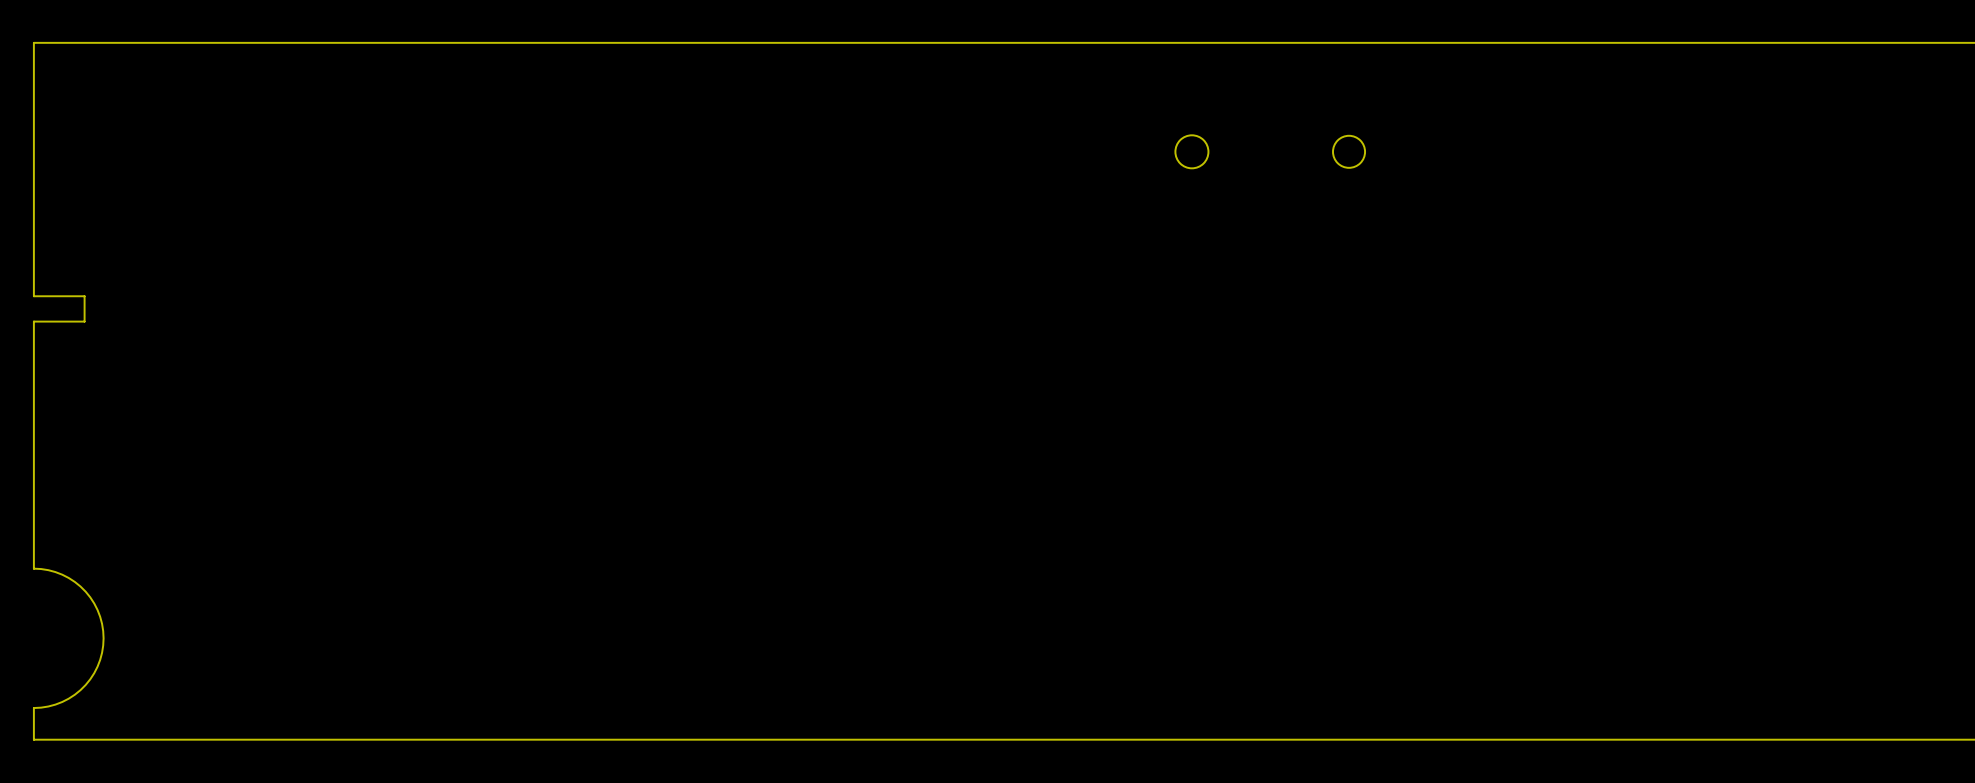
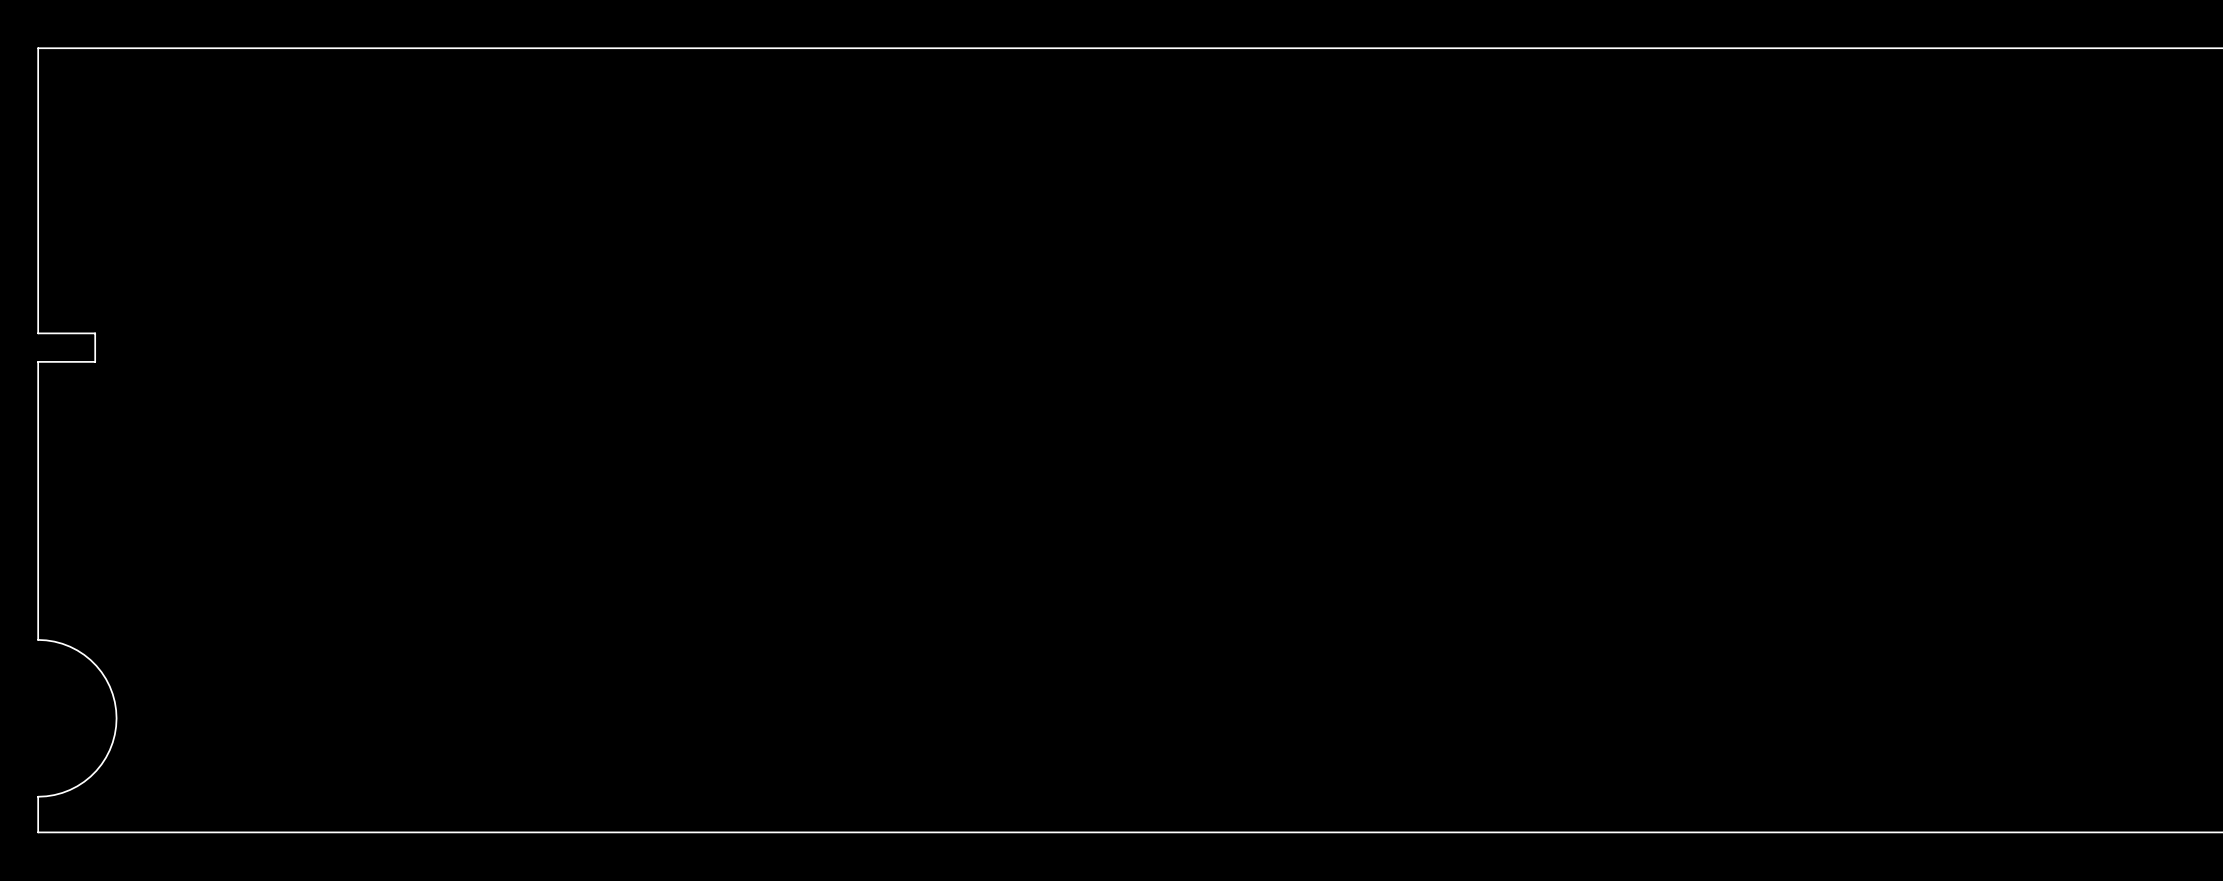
round board edge: [1175, 134, 1209, 169] -> none
round board edge: [1332, 135, 1366, 169] -> none

